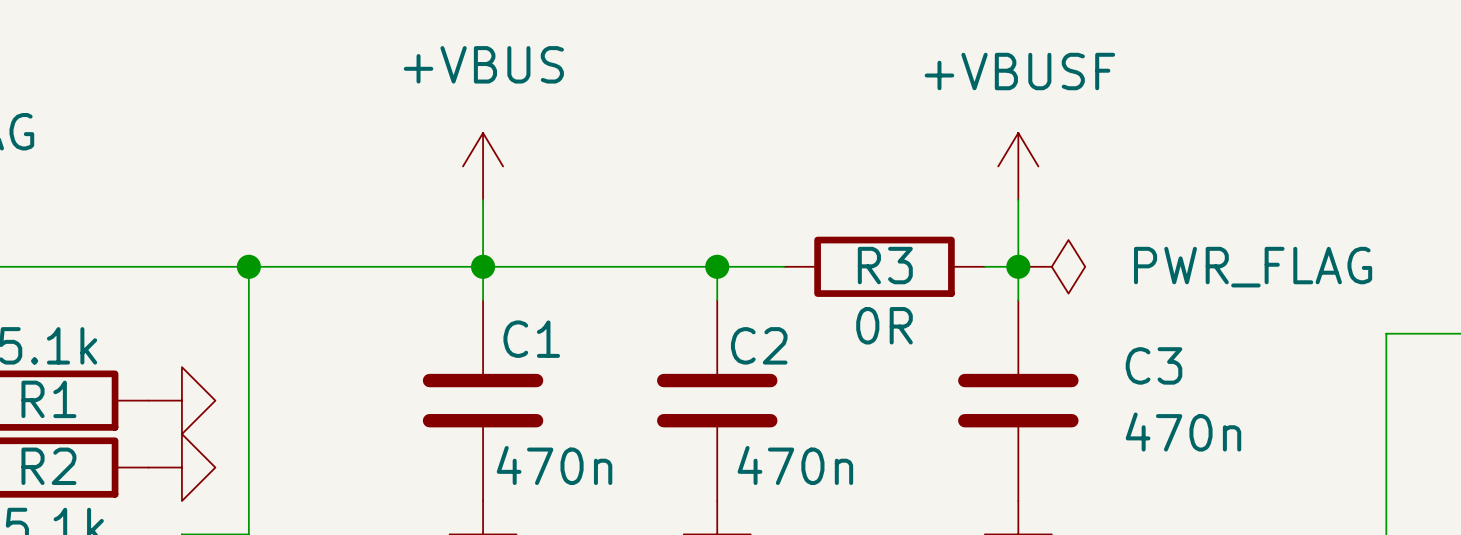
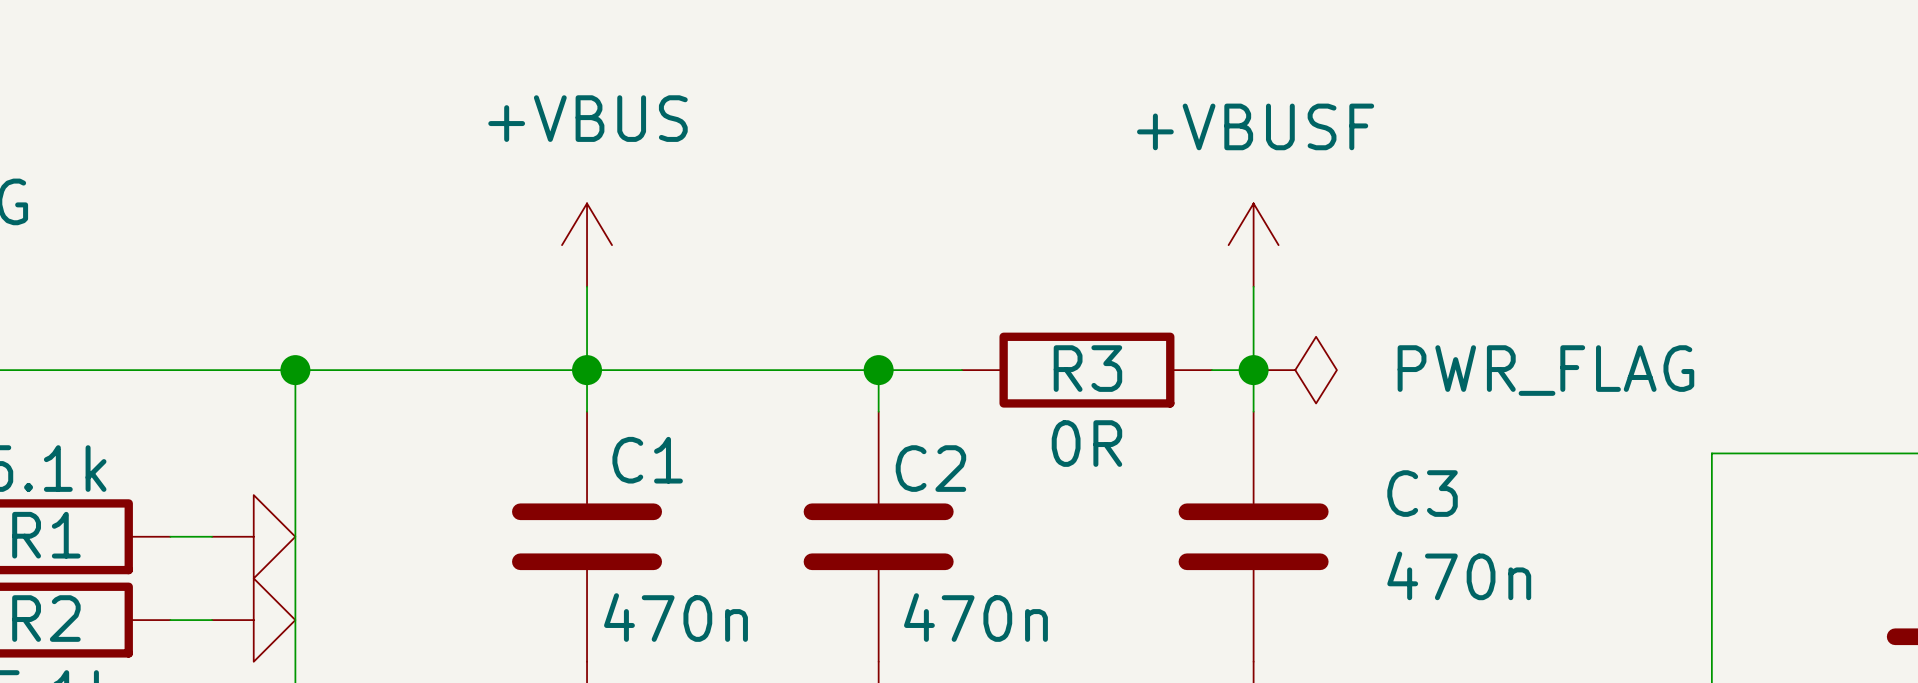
power symbol position: (181, 400) -> (253, 536)
power symbol position: (181, 467) -> (253, 620)

